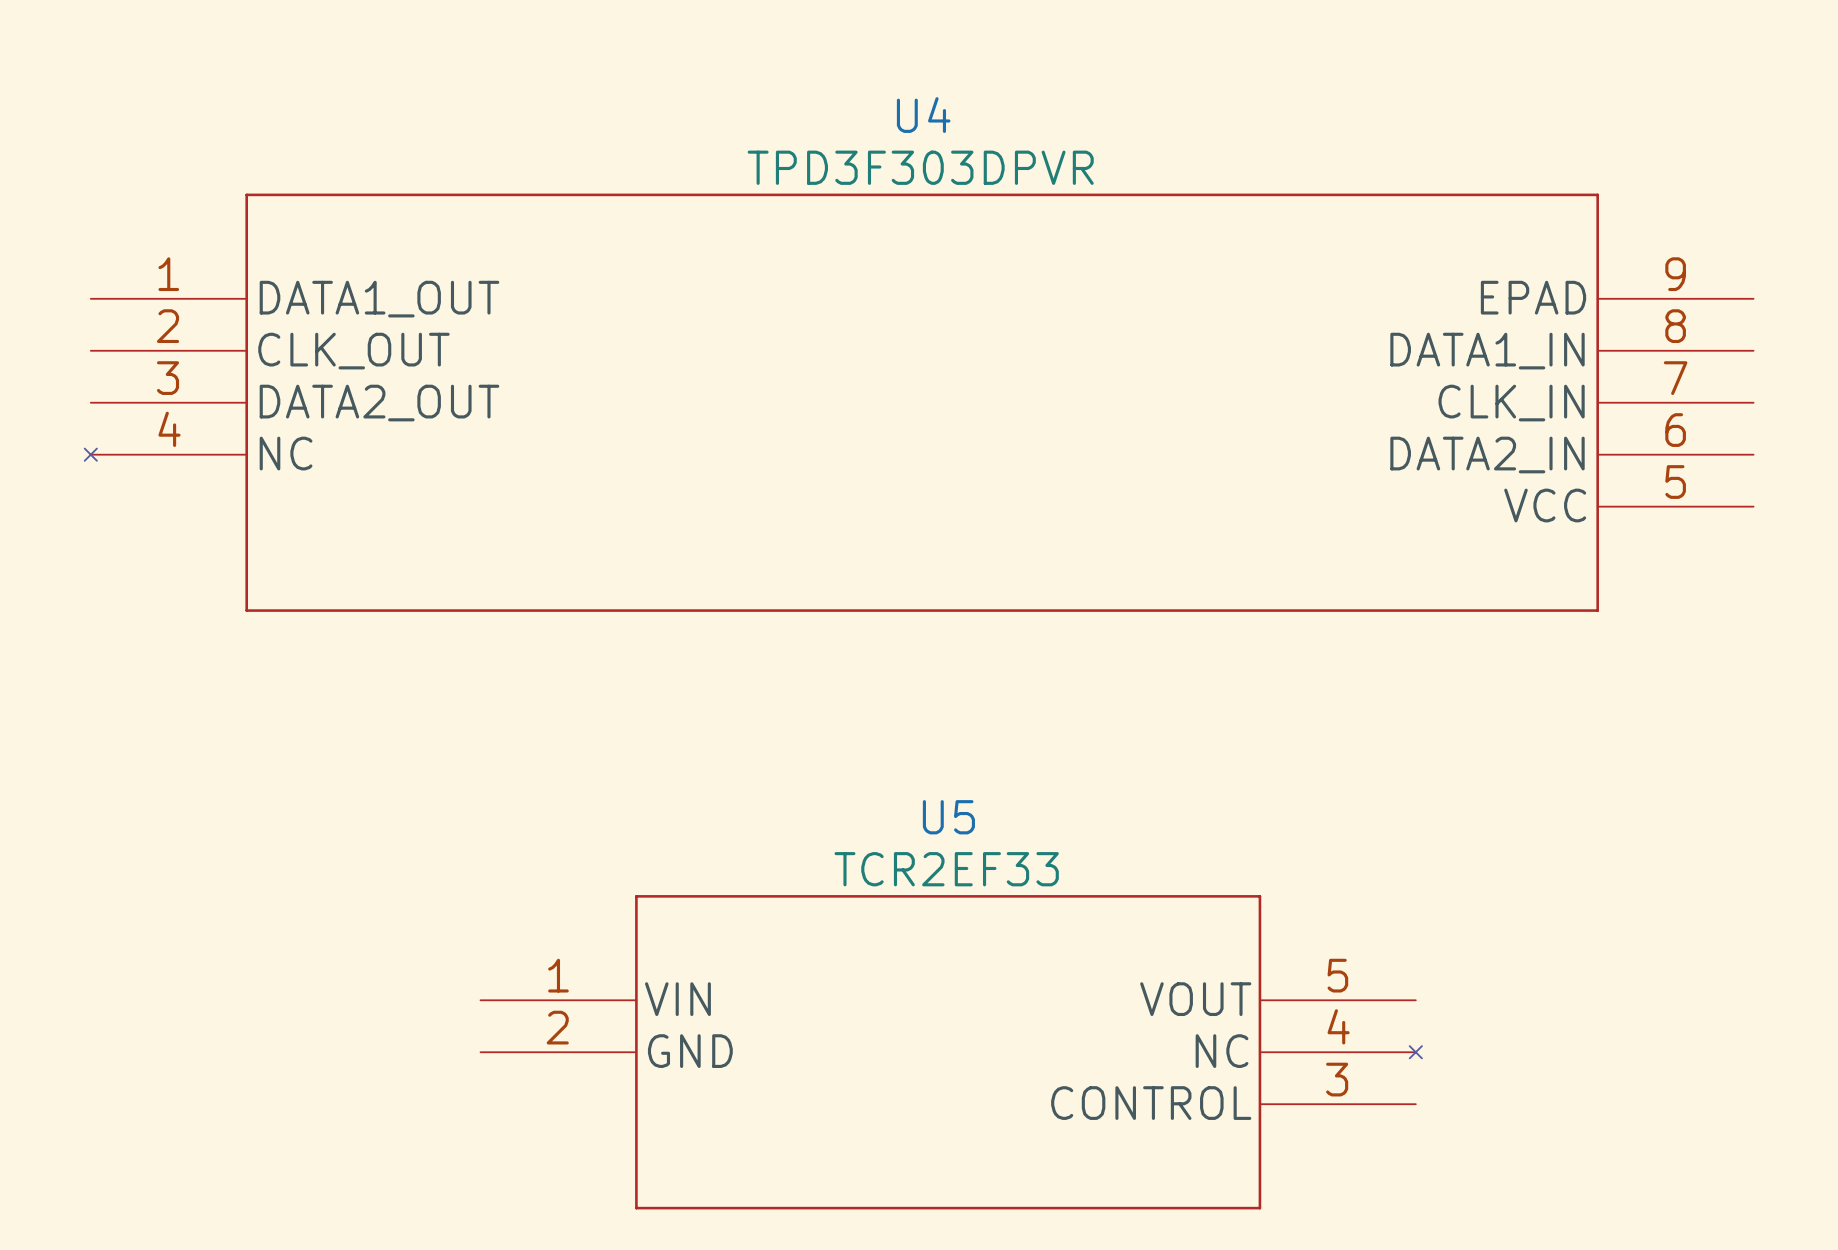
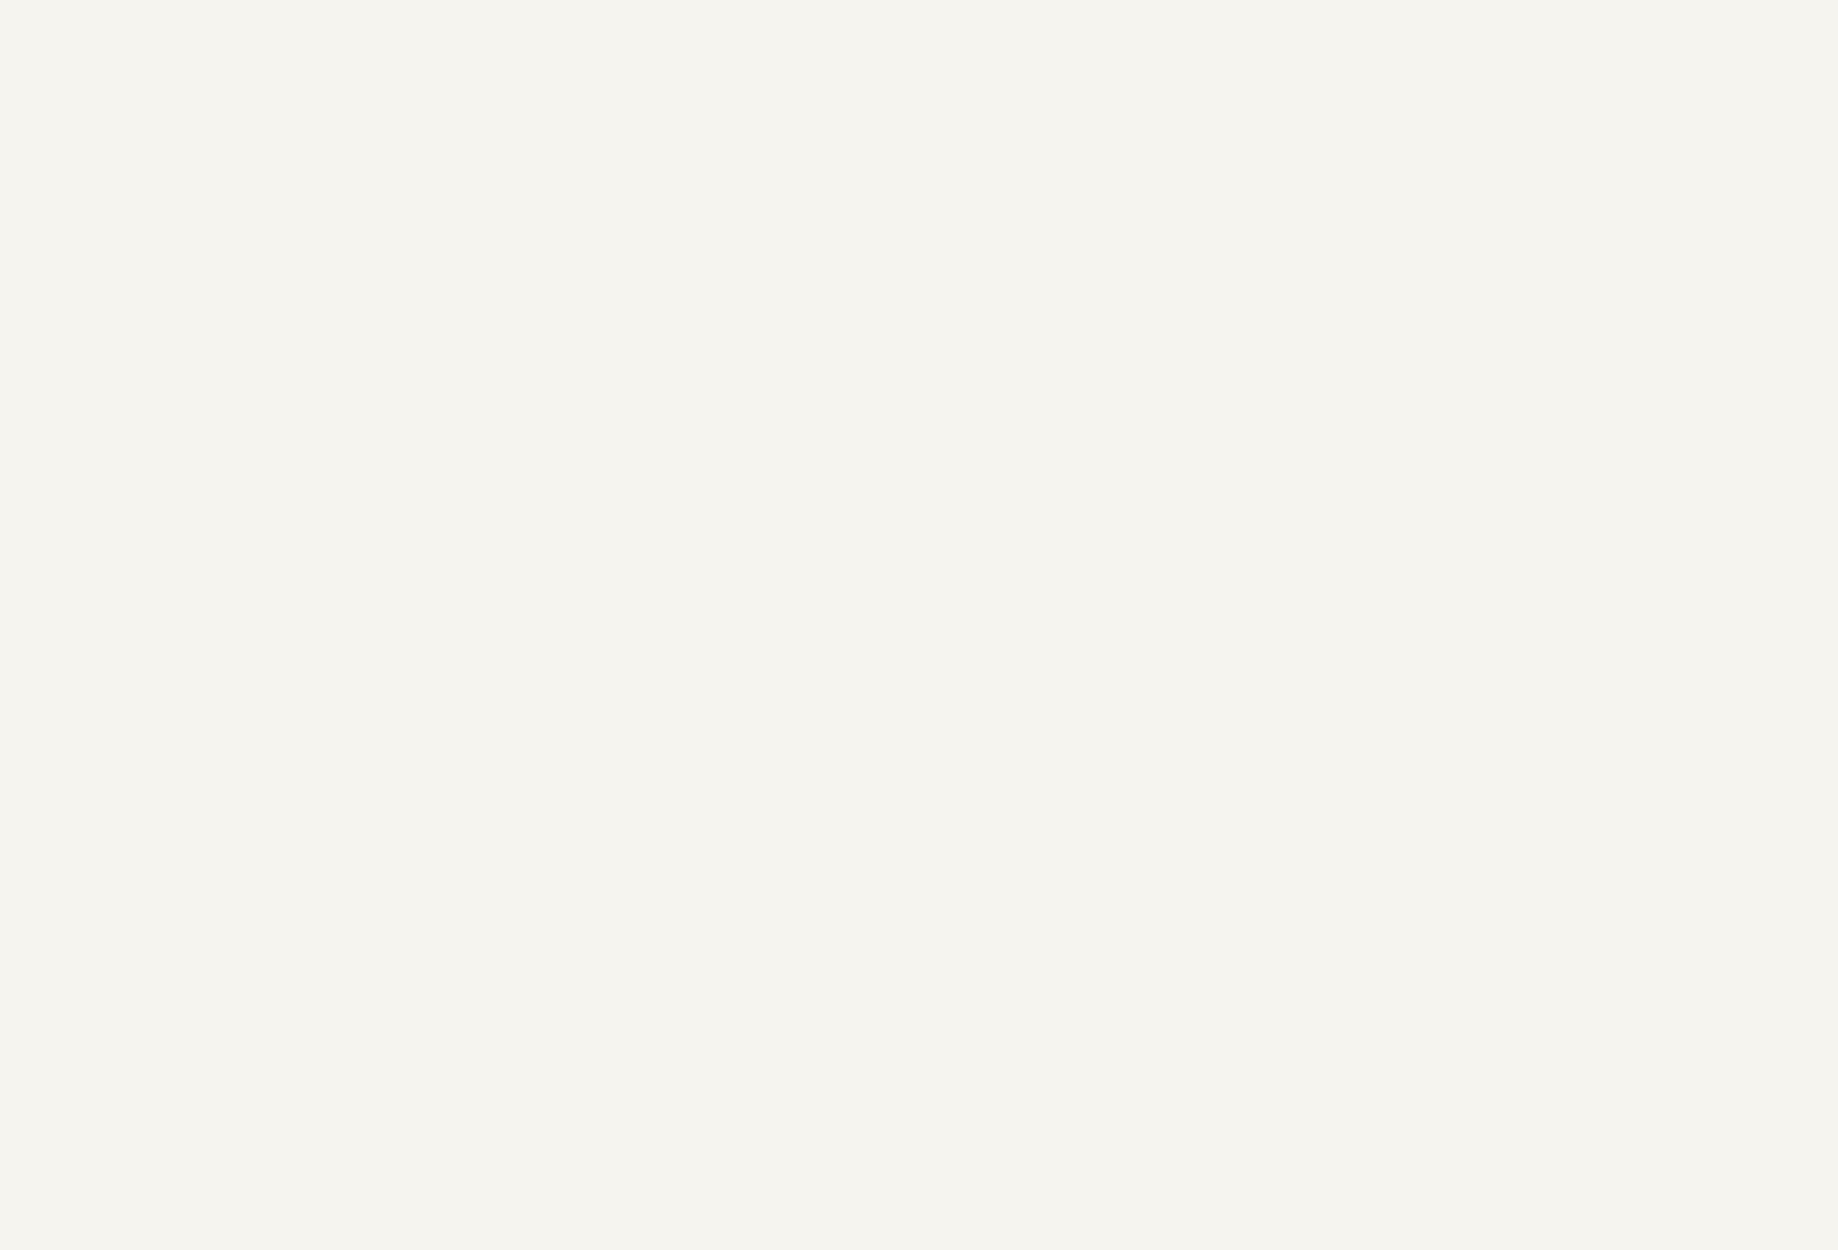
U4: TPD3F303DPVR (919, 402) -> none
U5: TCR2EF33 (951, 1052) -> none

